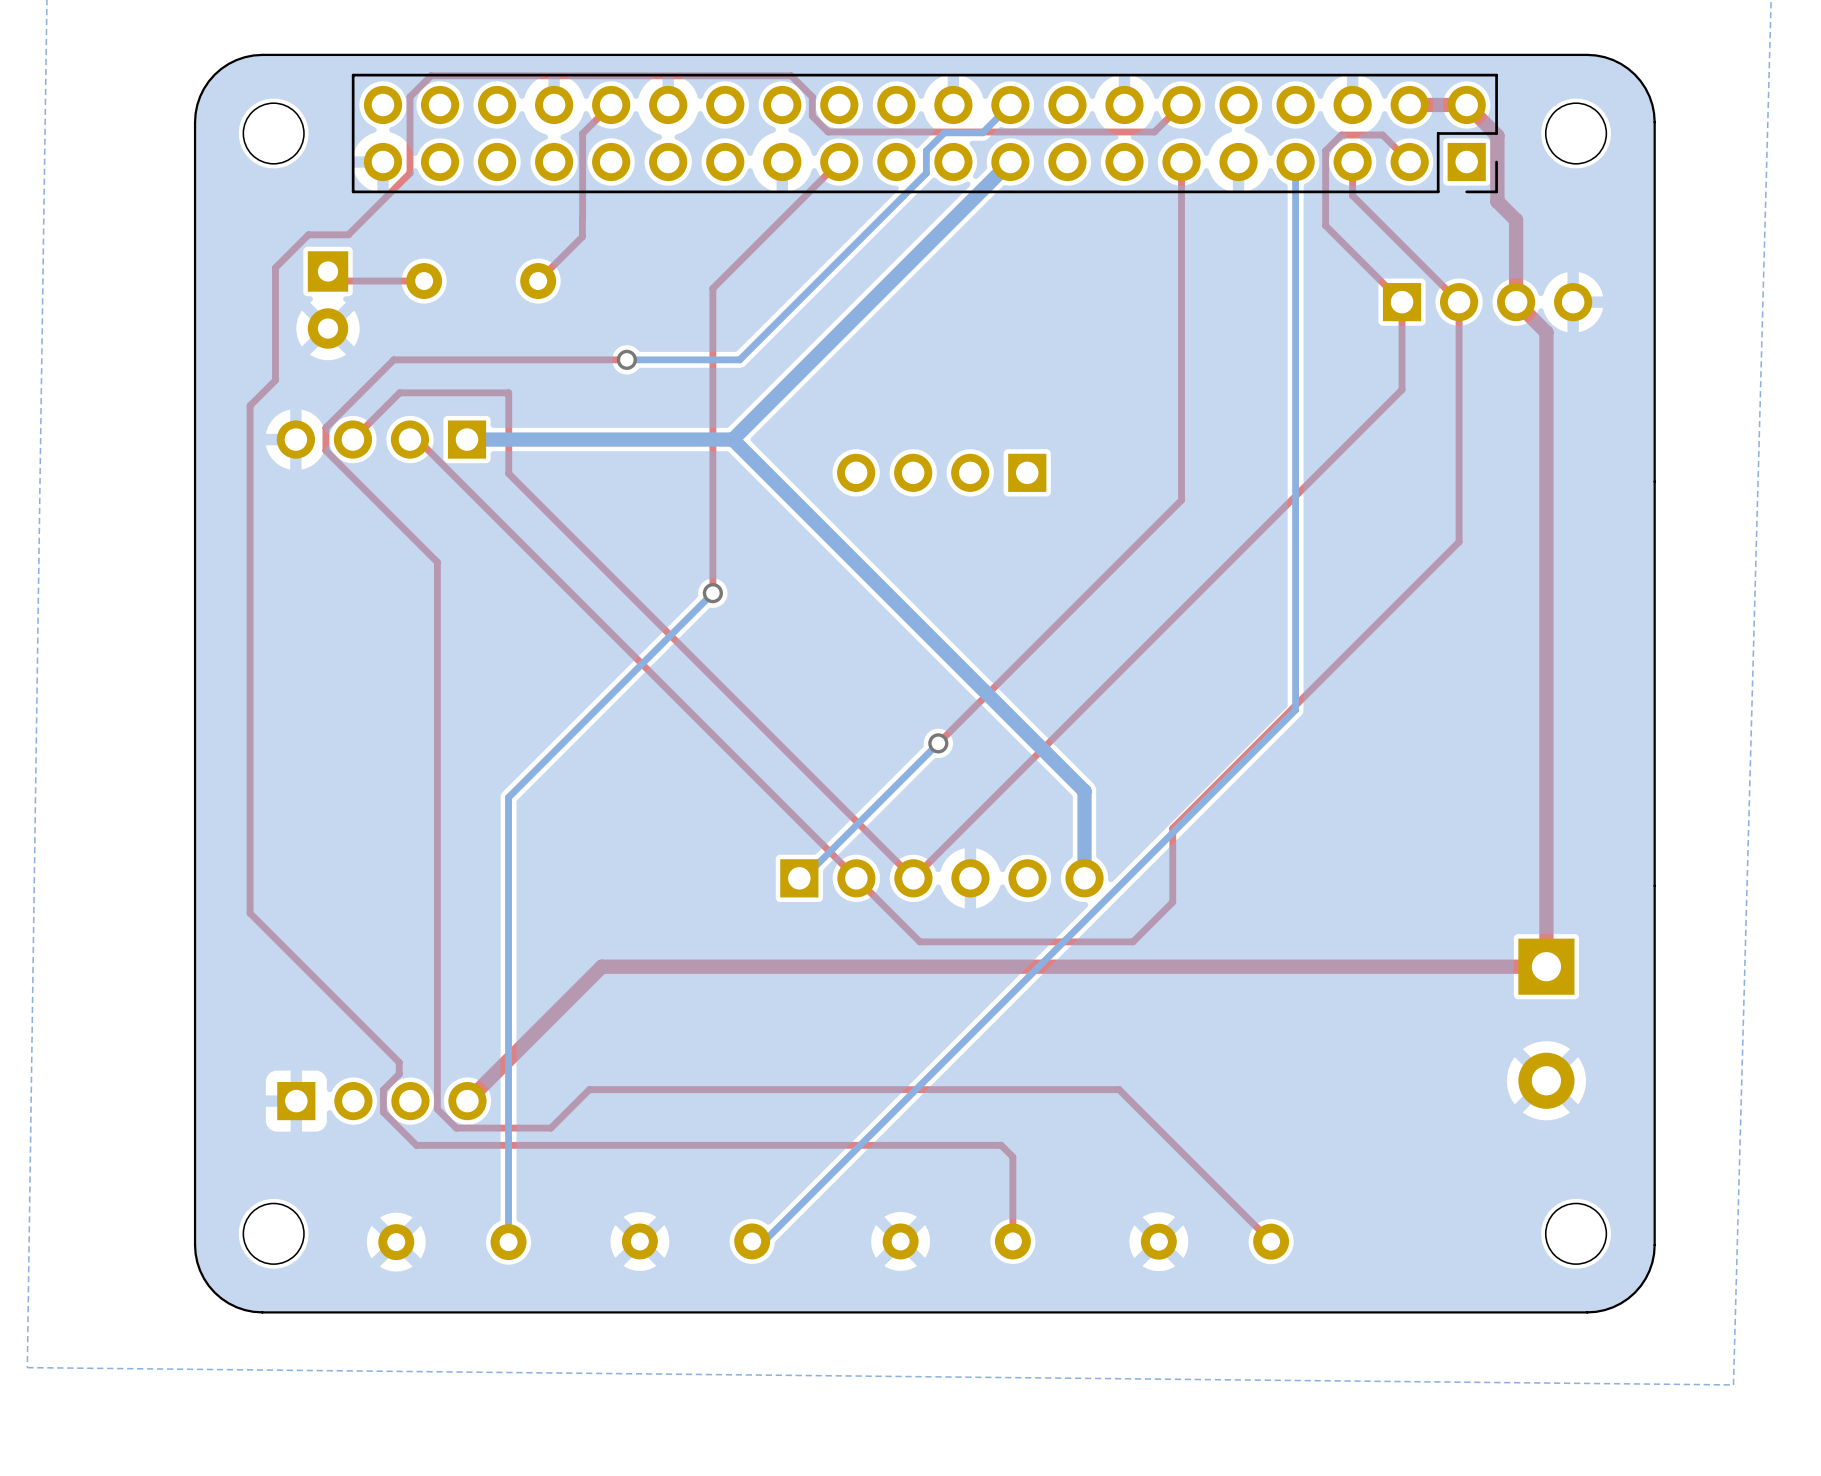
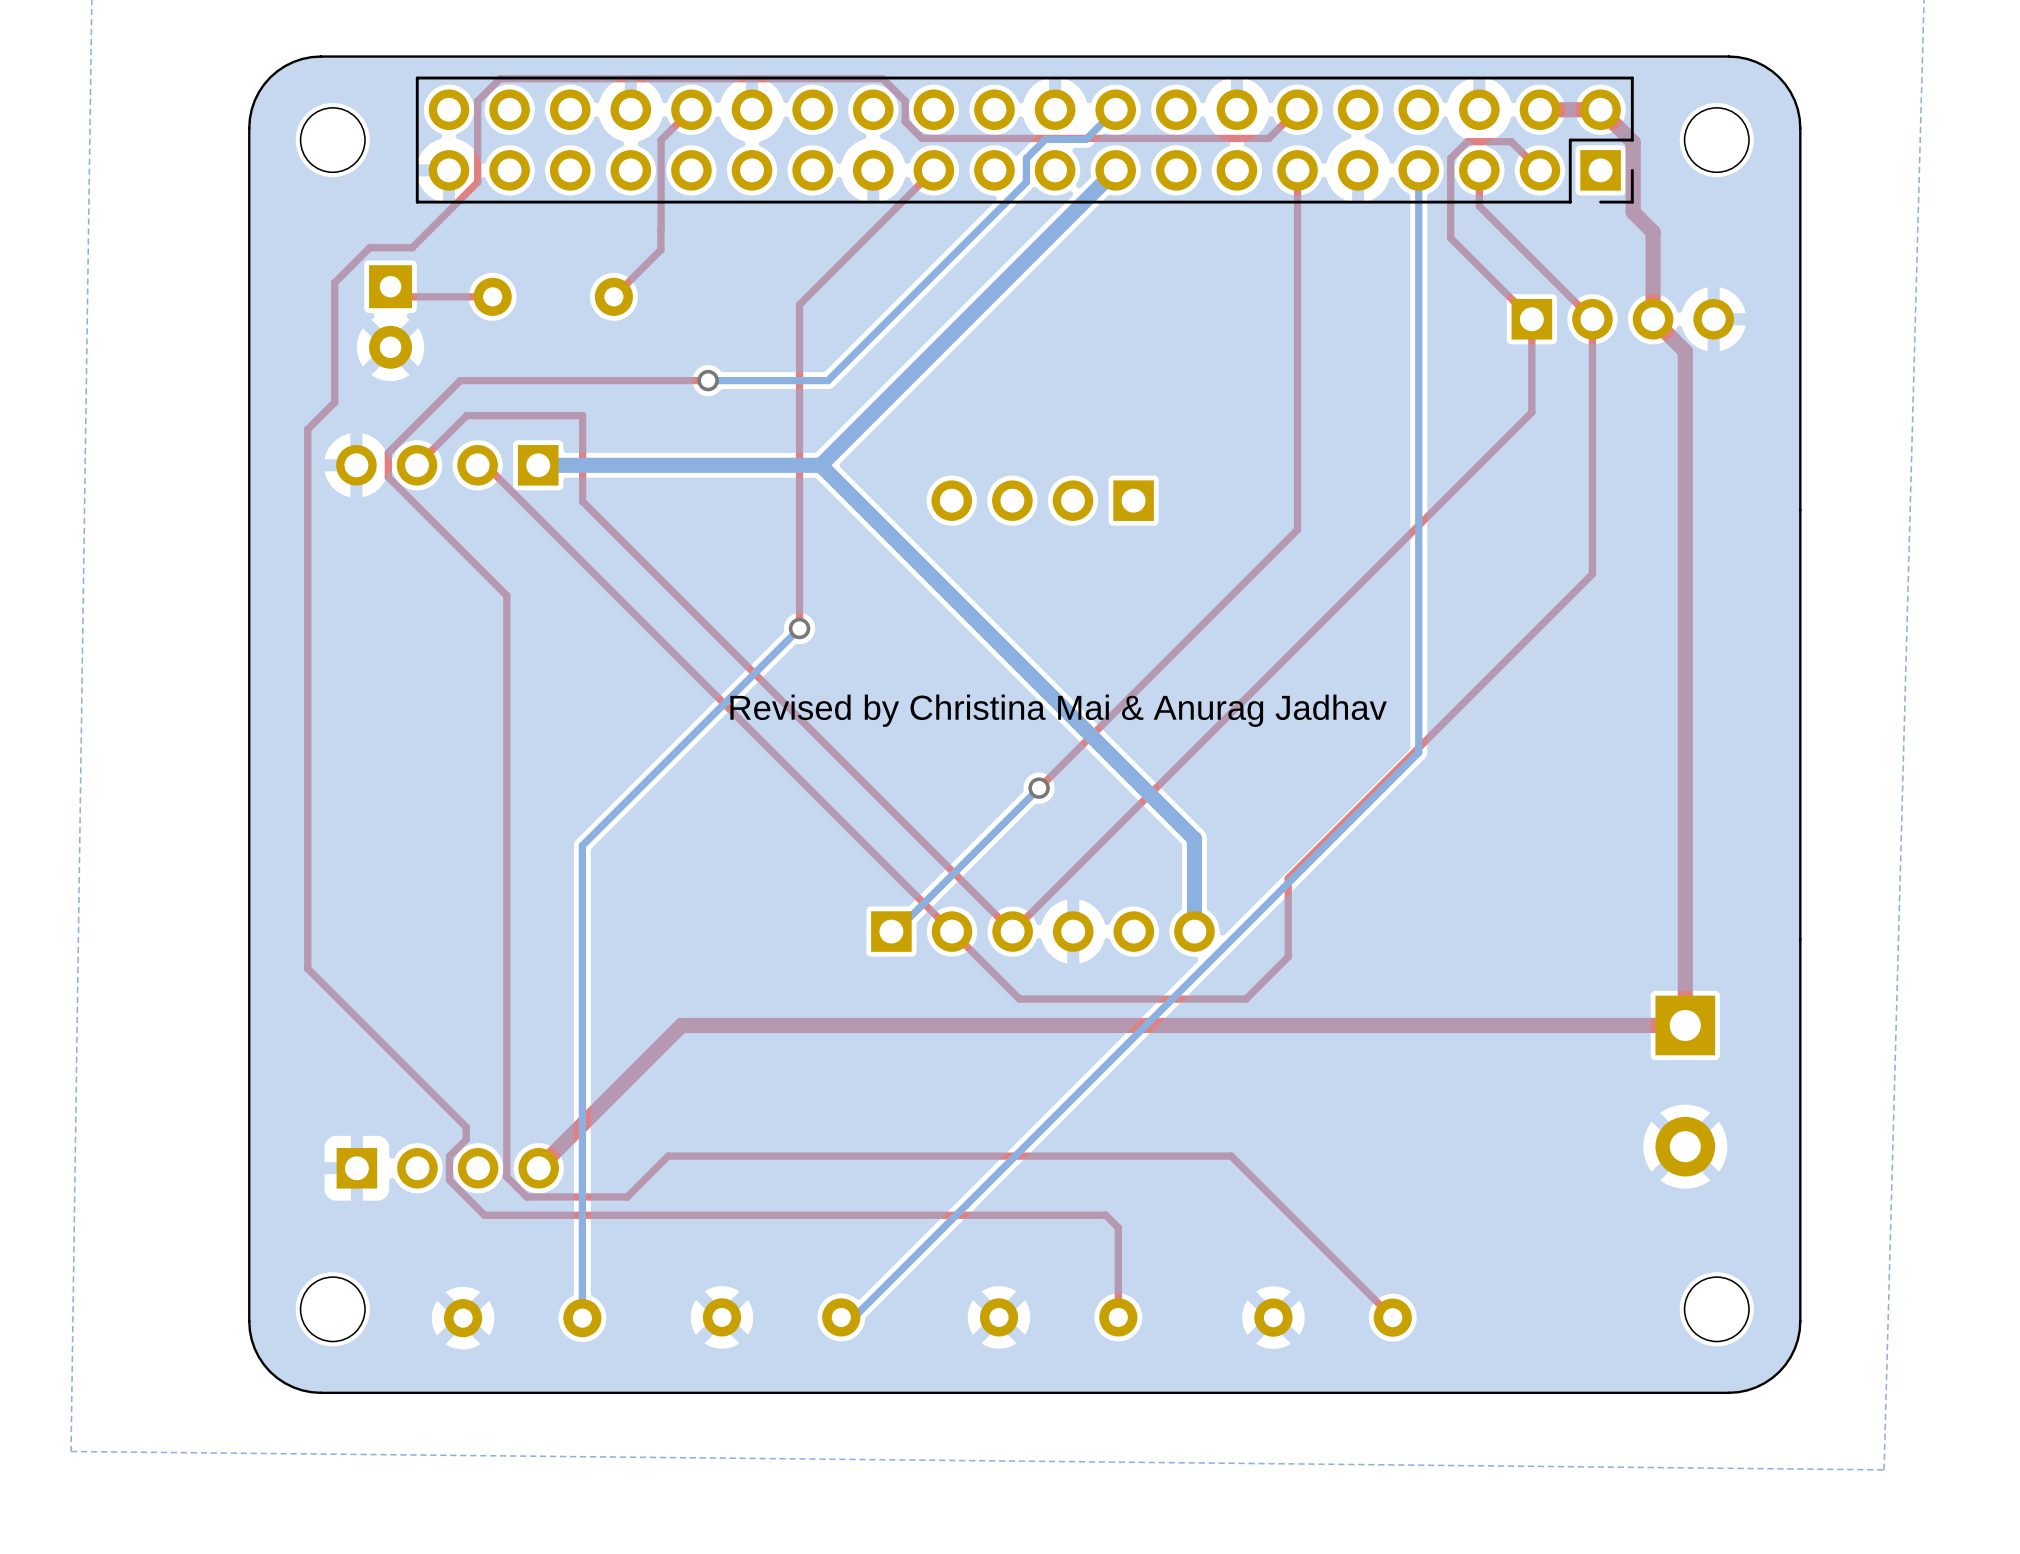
text: none -> Revised by Christina Mai & Anurag Jadhav (1058, 710)

